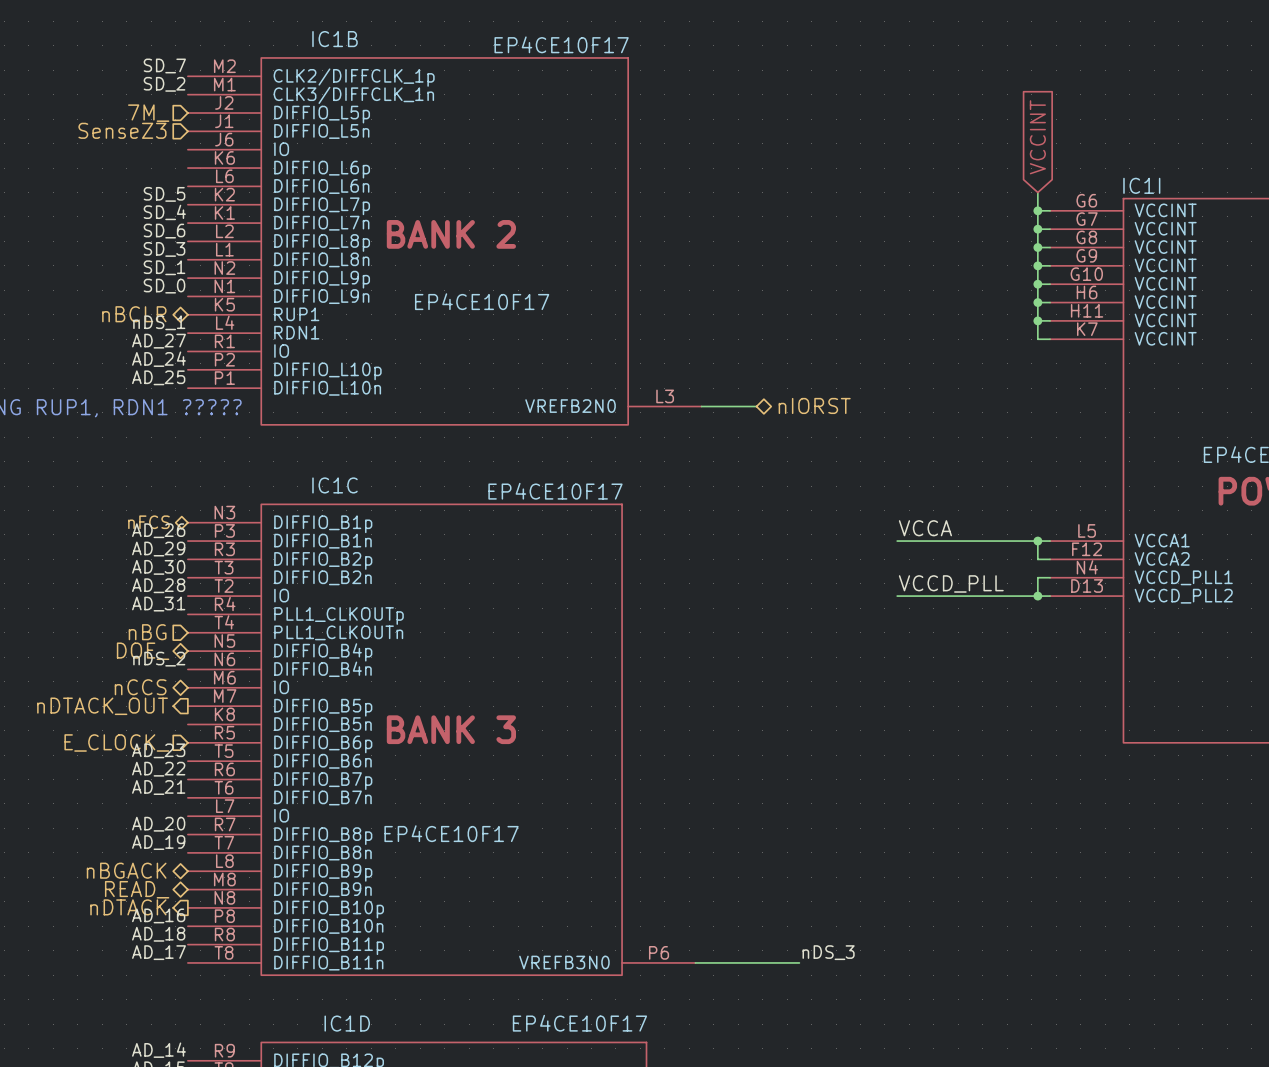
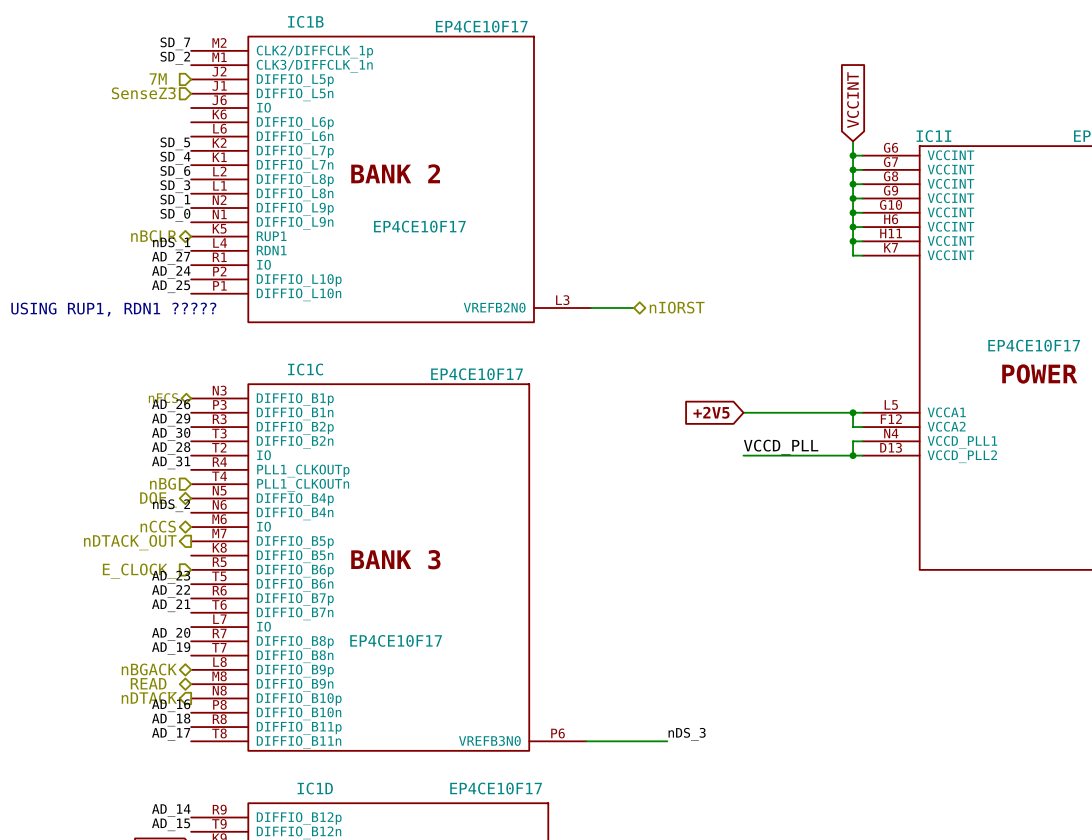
label: VCCA (925, 528) -> none
global label: none -> +2V5 (711, 412)

